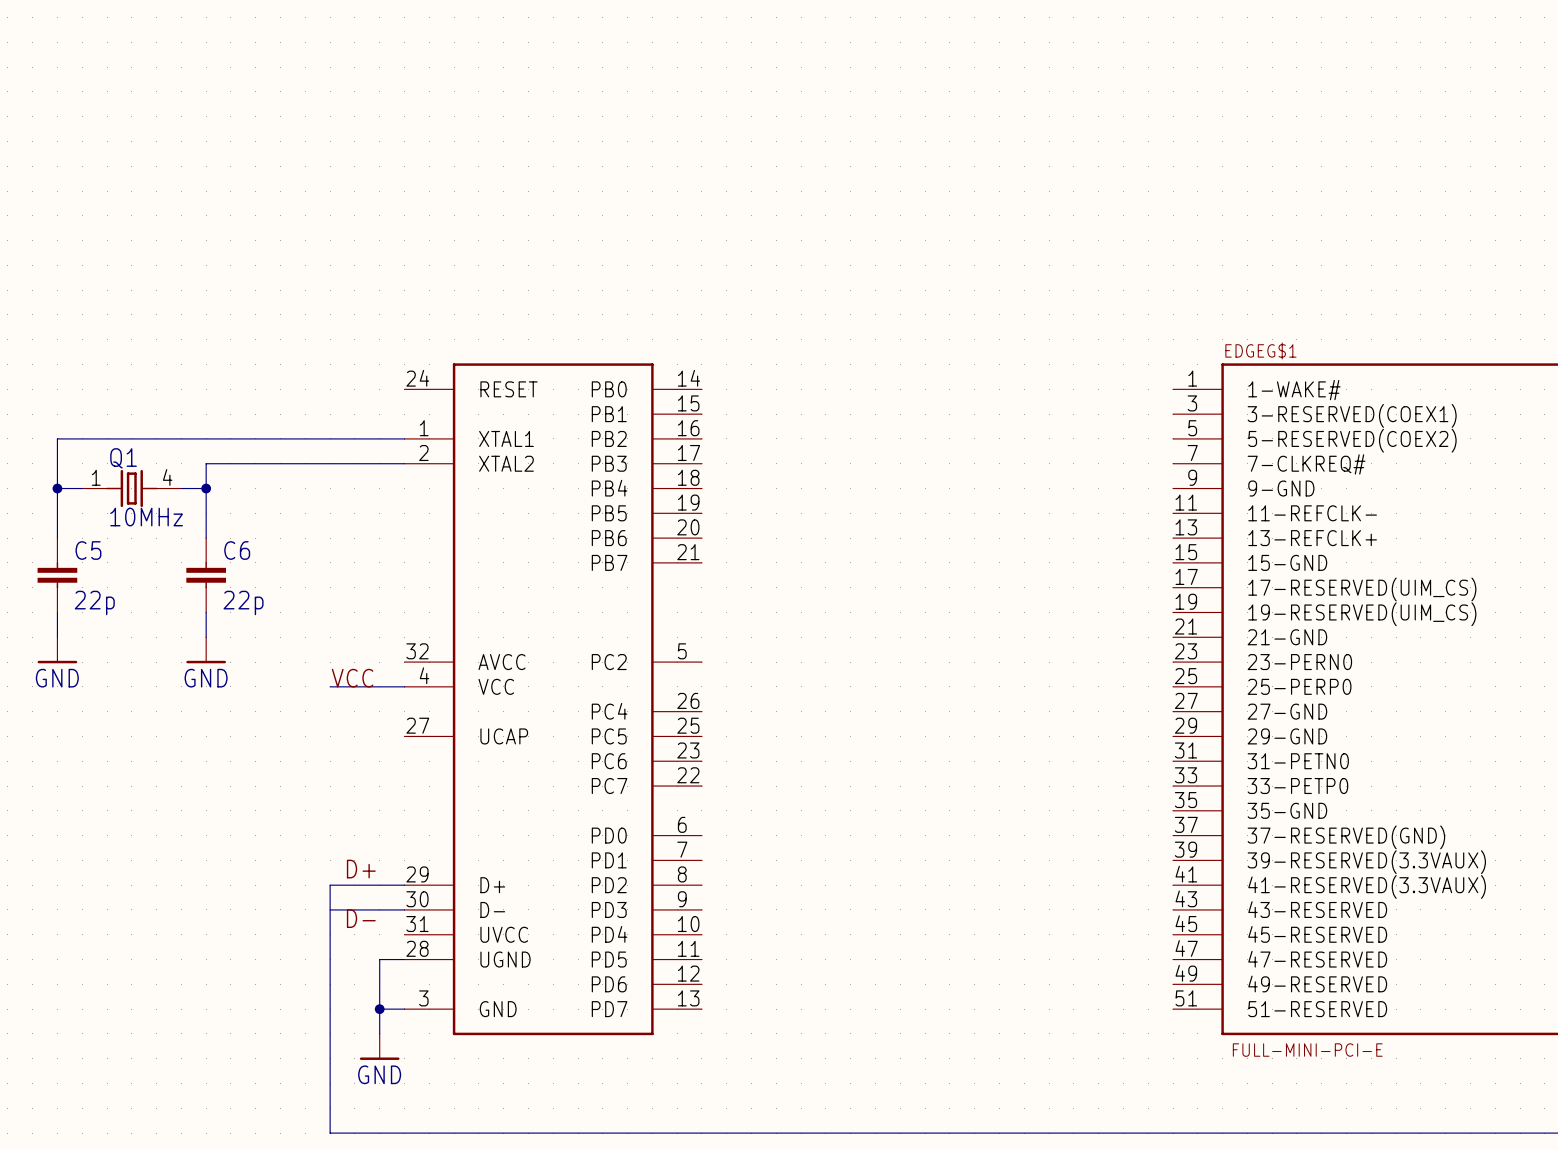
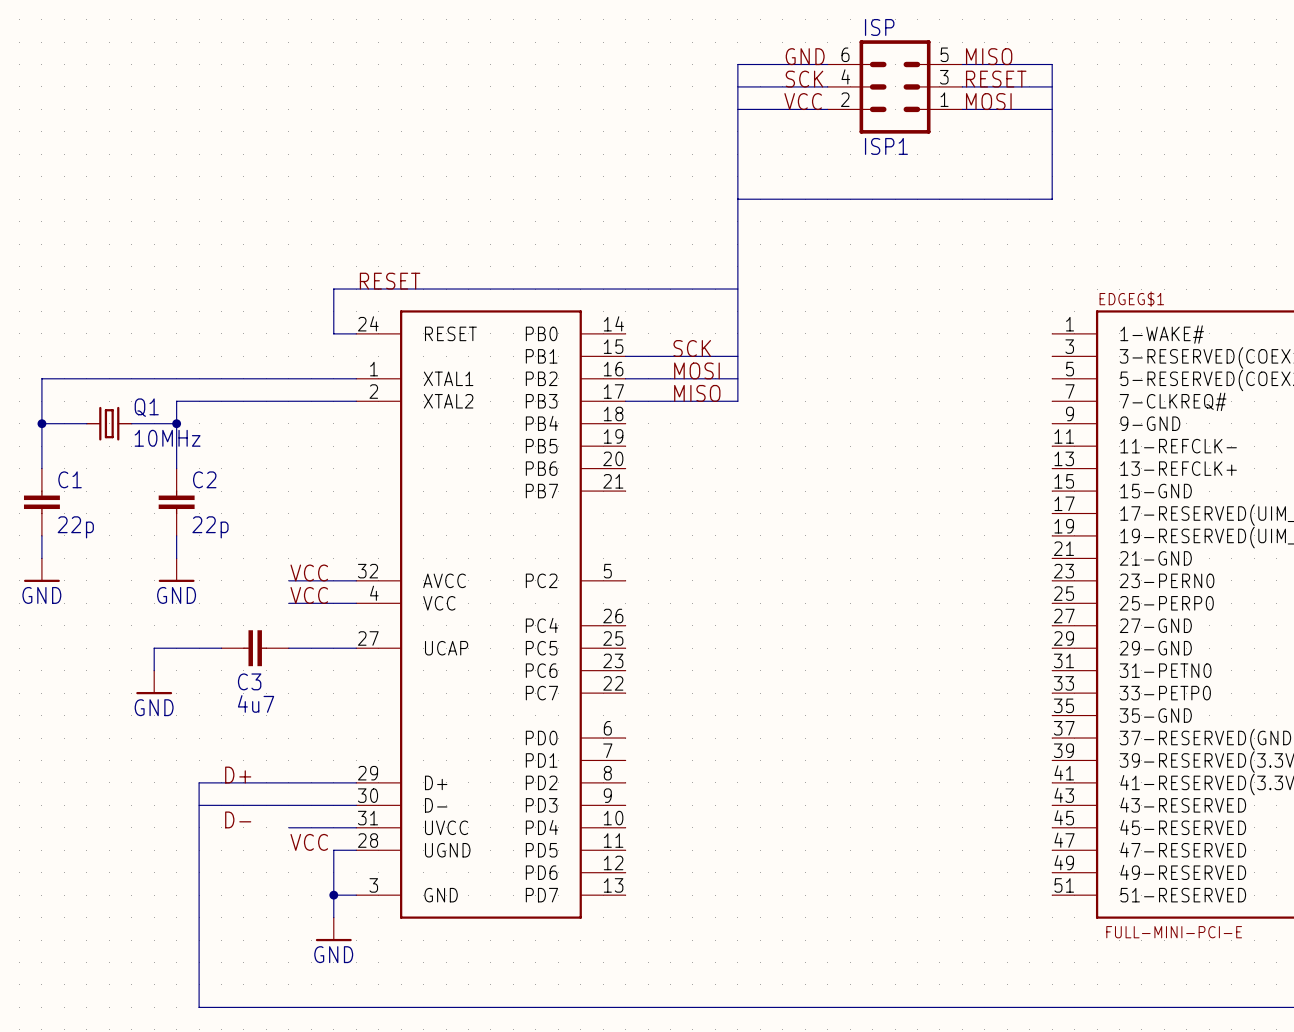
label: none -> GND (805, 56)
label: none -> MISO (989, 56)
bus: none -> (737, 64) (737, 401)
wire: none -> (737, 64) (827, 64)
wire: none -> (962, 64) (1052, 64)
bus: none -> (1052, 64) (1052, 199) (737, 199)
label: none -> SCK (804, 79)
label: none -> RESET (996, 79)
wire: none -> (737, 86) (827, 86)
ISP: none -> ISP1 (895, 86)
wire: none -> (962, 86) (1052, 86)
label: none -> VCC (803, 101)
label: none -> MOSI (988, 101)
wire: none -> (737, 109) (827, 109)
wire: none -> (962, 109) (1052, 109)
label: none -> RESET (390, 281)
wire: none -> (737, 289) (333, 289) (333, 333) (356, 333)
label: none -> SCK (692, 348)
wire: none -> (625, 356) (737, 356)
label: none -> MOSI (696, 370)
wire: none -> (625, 378) (737, 378)
label: none -> MISO (697, 393)
Q1 name position: Q1 (123, 458) -> Q1 (146, 407)
wire: none -> (625, 401) (737, 401)
Q1 symbol: [82, 469, 182, 508] -> [86, 406, 133, 441]
Q1 value position: 10MHz (146, 517) -> 10MHz (167, 438)
C5 name: C5 (88, 550) -> C1 (70, 479)
C6 name: C6 (237, 550) -> C2 (204, 479)
label: none -> VCC (309, 572)
wire: none -> (288, 580) (356, 580)
wire: none -> (221, 648) (154, 648) (154, 670)
C3: none -> 4u7 (255, 648)
wire: none -> (288, 648) (356, 648)
power symbol: none -> GND (154, 682)
label position: D+ (361, 869) -> D+ (238, 775)
wire: none -> (199, 782) (288, 782)
bus: (330, 885) (330, 1133) -> (199, 782) (199, 1007) (288, 1007)
wire: none -> (199, 805) (288, 805)
label position: D- (361, 918) -> D- (238, 819)
wire: none -> (288, 827) (356, 827)
label: none -> VCC (309, 842)

